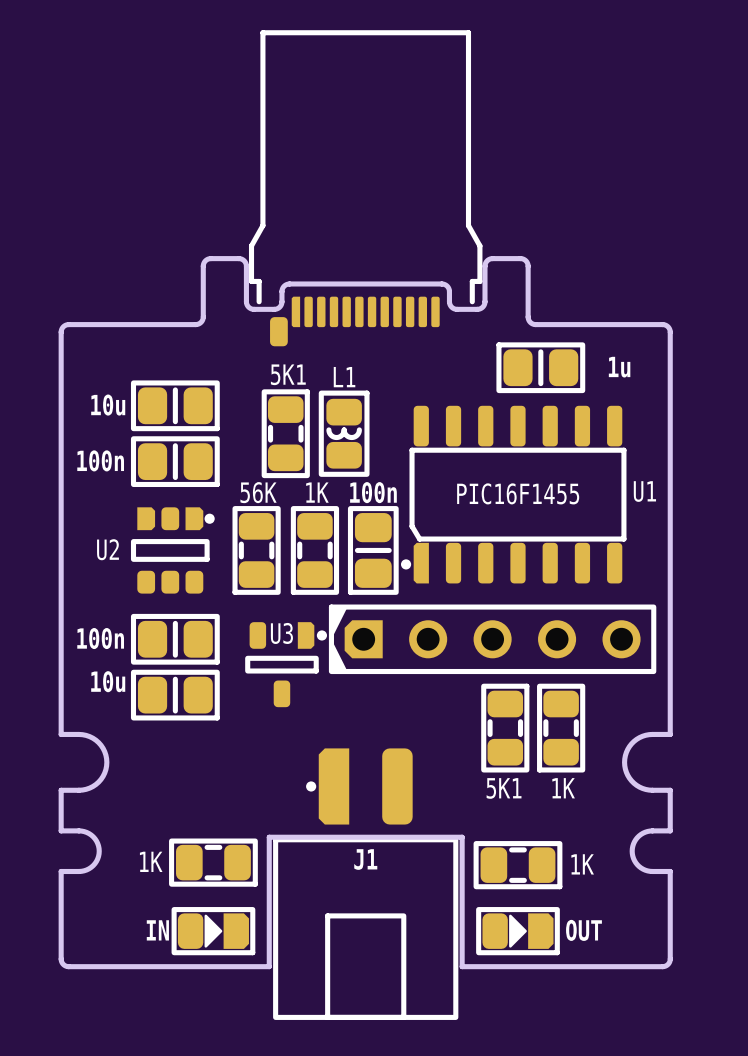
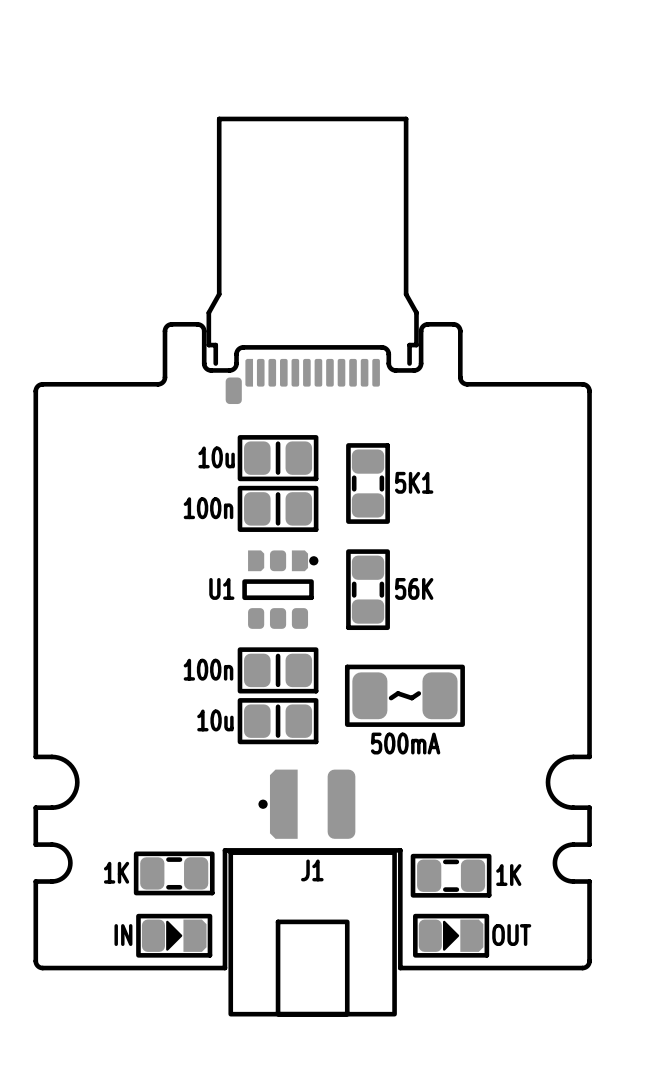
part: 1u (540, 367) -> none
part value position: 5K1 (288, 374) -> 5K1 (414, 482)
part position: (175, 405) -> (278, 458)
U1 footprint: [400, 405, 627, 584] -> [242, 550, 319, 629]
part position: (285, 433) -> (368, 483)
L1: (344, 433) -> none
part: 100n (175, 461) -> none
part: none -> 100n (278, 508)
U1 name position: U1 (644, 491) -> U1 (221, 588)
part value position: 56K (258, 492) -> 56K (414, 588)
U1 value: PIC16F1455 (518, 493) -> none
U2: (172, 550) -> none
part position: (256, 550) -> (368, 589)
part: 1K (314, 550) -> none
part: 100n (373, 550) -> none
part: 100n (175, 639) -> none
part: none -> 100n (278, 670)
part: (492, 639) -> none
U3: (286, 664) -> none
part: none -> 500mA (404, 695)
part value position: 10u (108, 681) -> 10u (215, 720)
part position: (175, 695) -> (278, 721)
part: 5K1 (505, 728) -> none
part: 1K (561, 728) -> none

